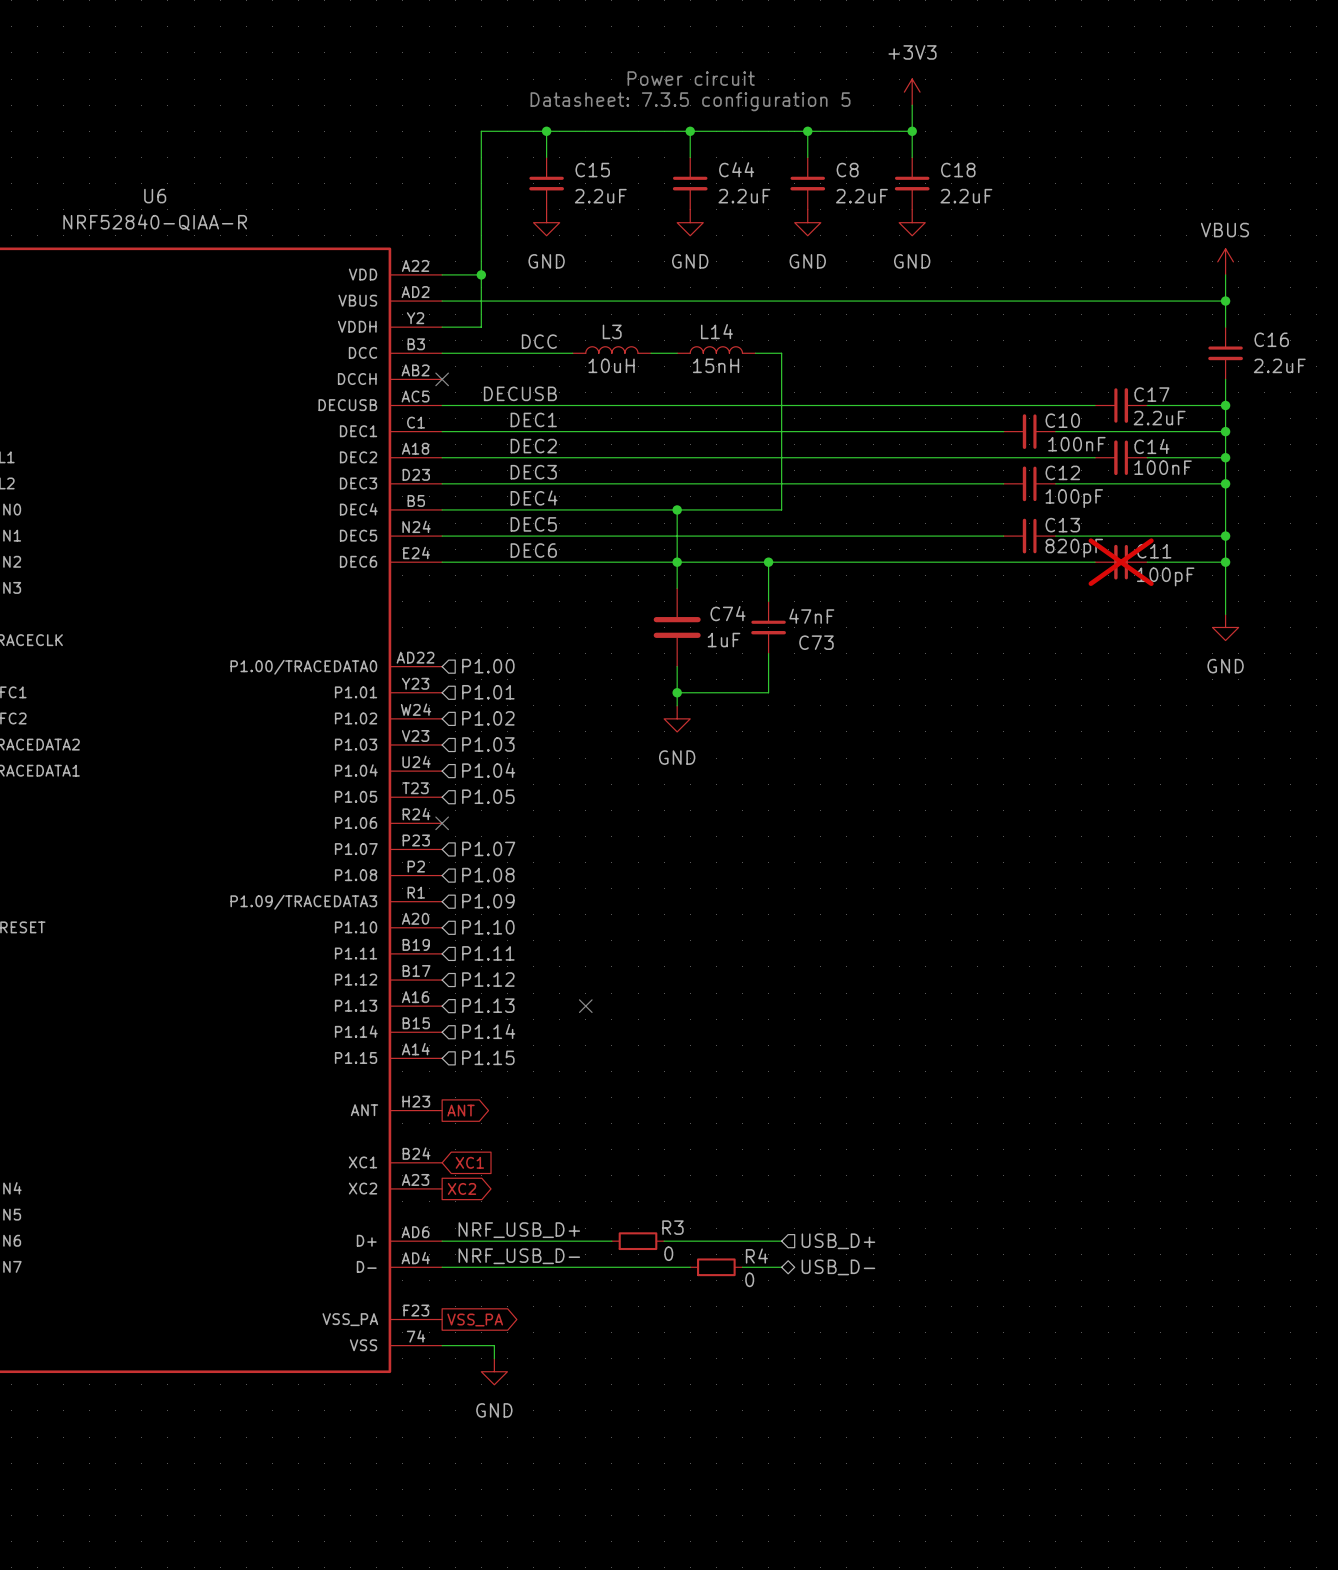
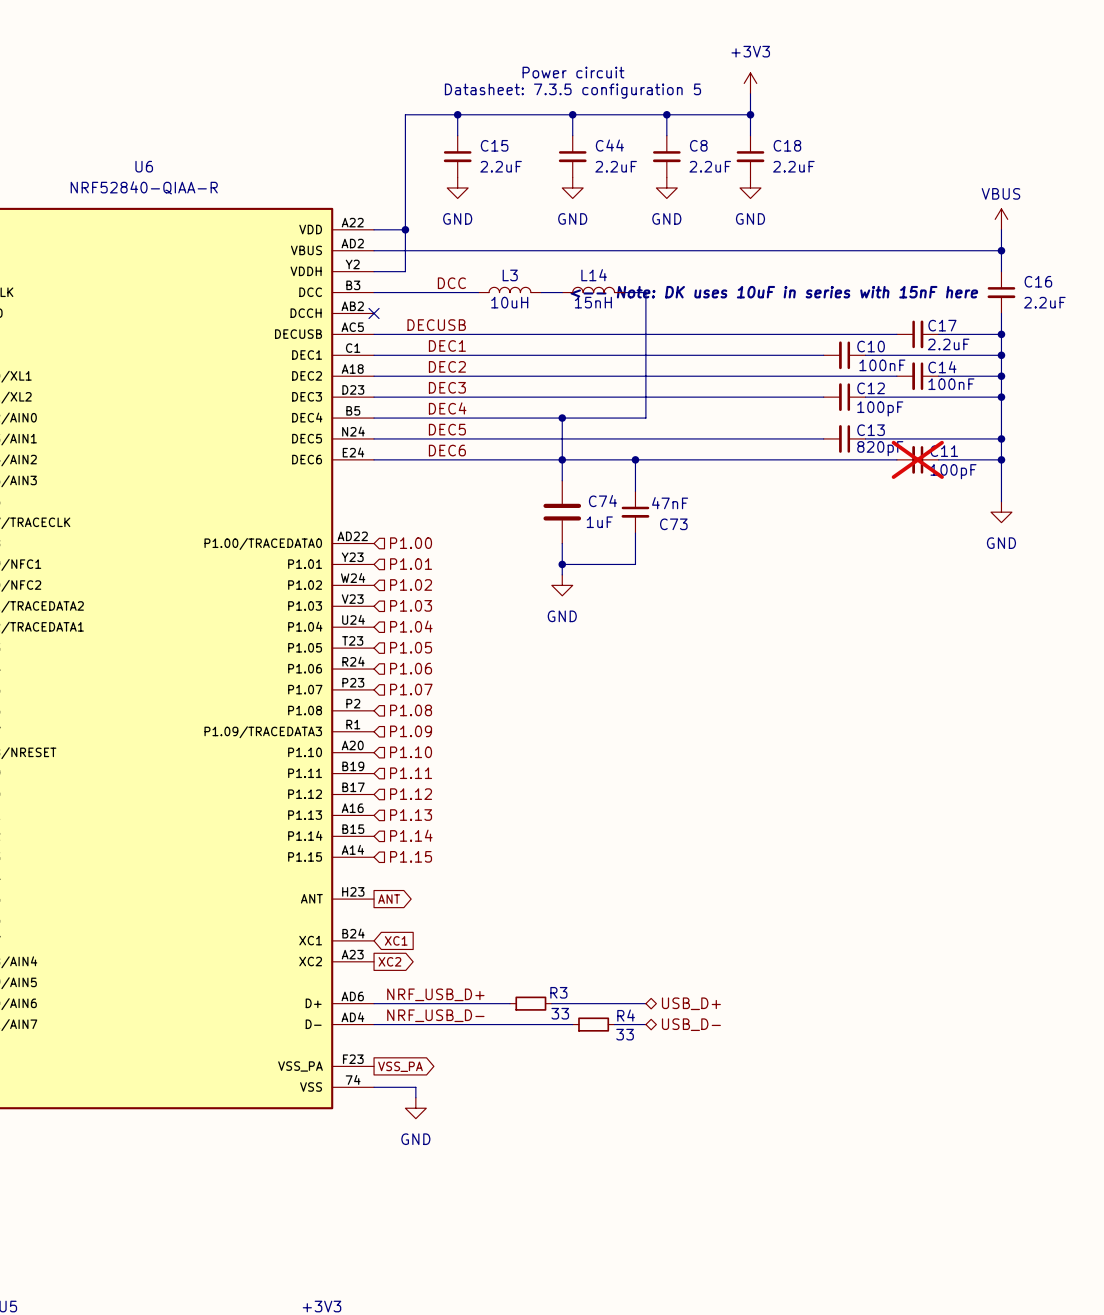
text: none -> <-- Note: DK uses 10uF in series with 15nF here (774, 292)
hierarchical label: none -> P1.06 (411, 668)
no-connect mark: (442, 823) -> none
no-connect mark: (585, 1006) -> none
hierarchical label shape: input (838, 1241) -> bidirectional (691, 1003)
R3 value: 0 (668, 1253) -> 33 (560, 1013)
R4 value: 0 (749, 1279) -> 33 (625, 1034)

